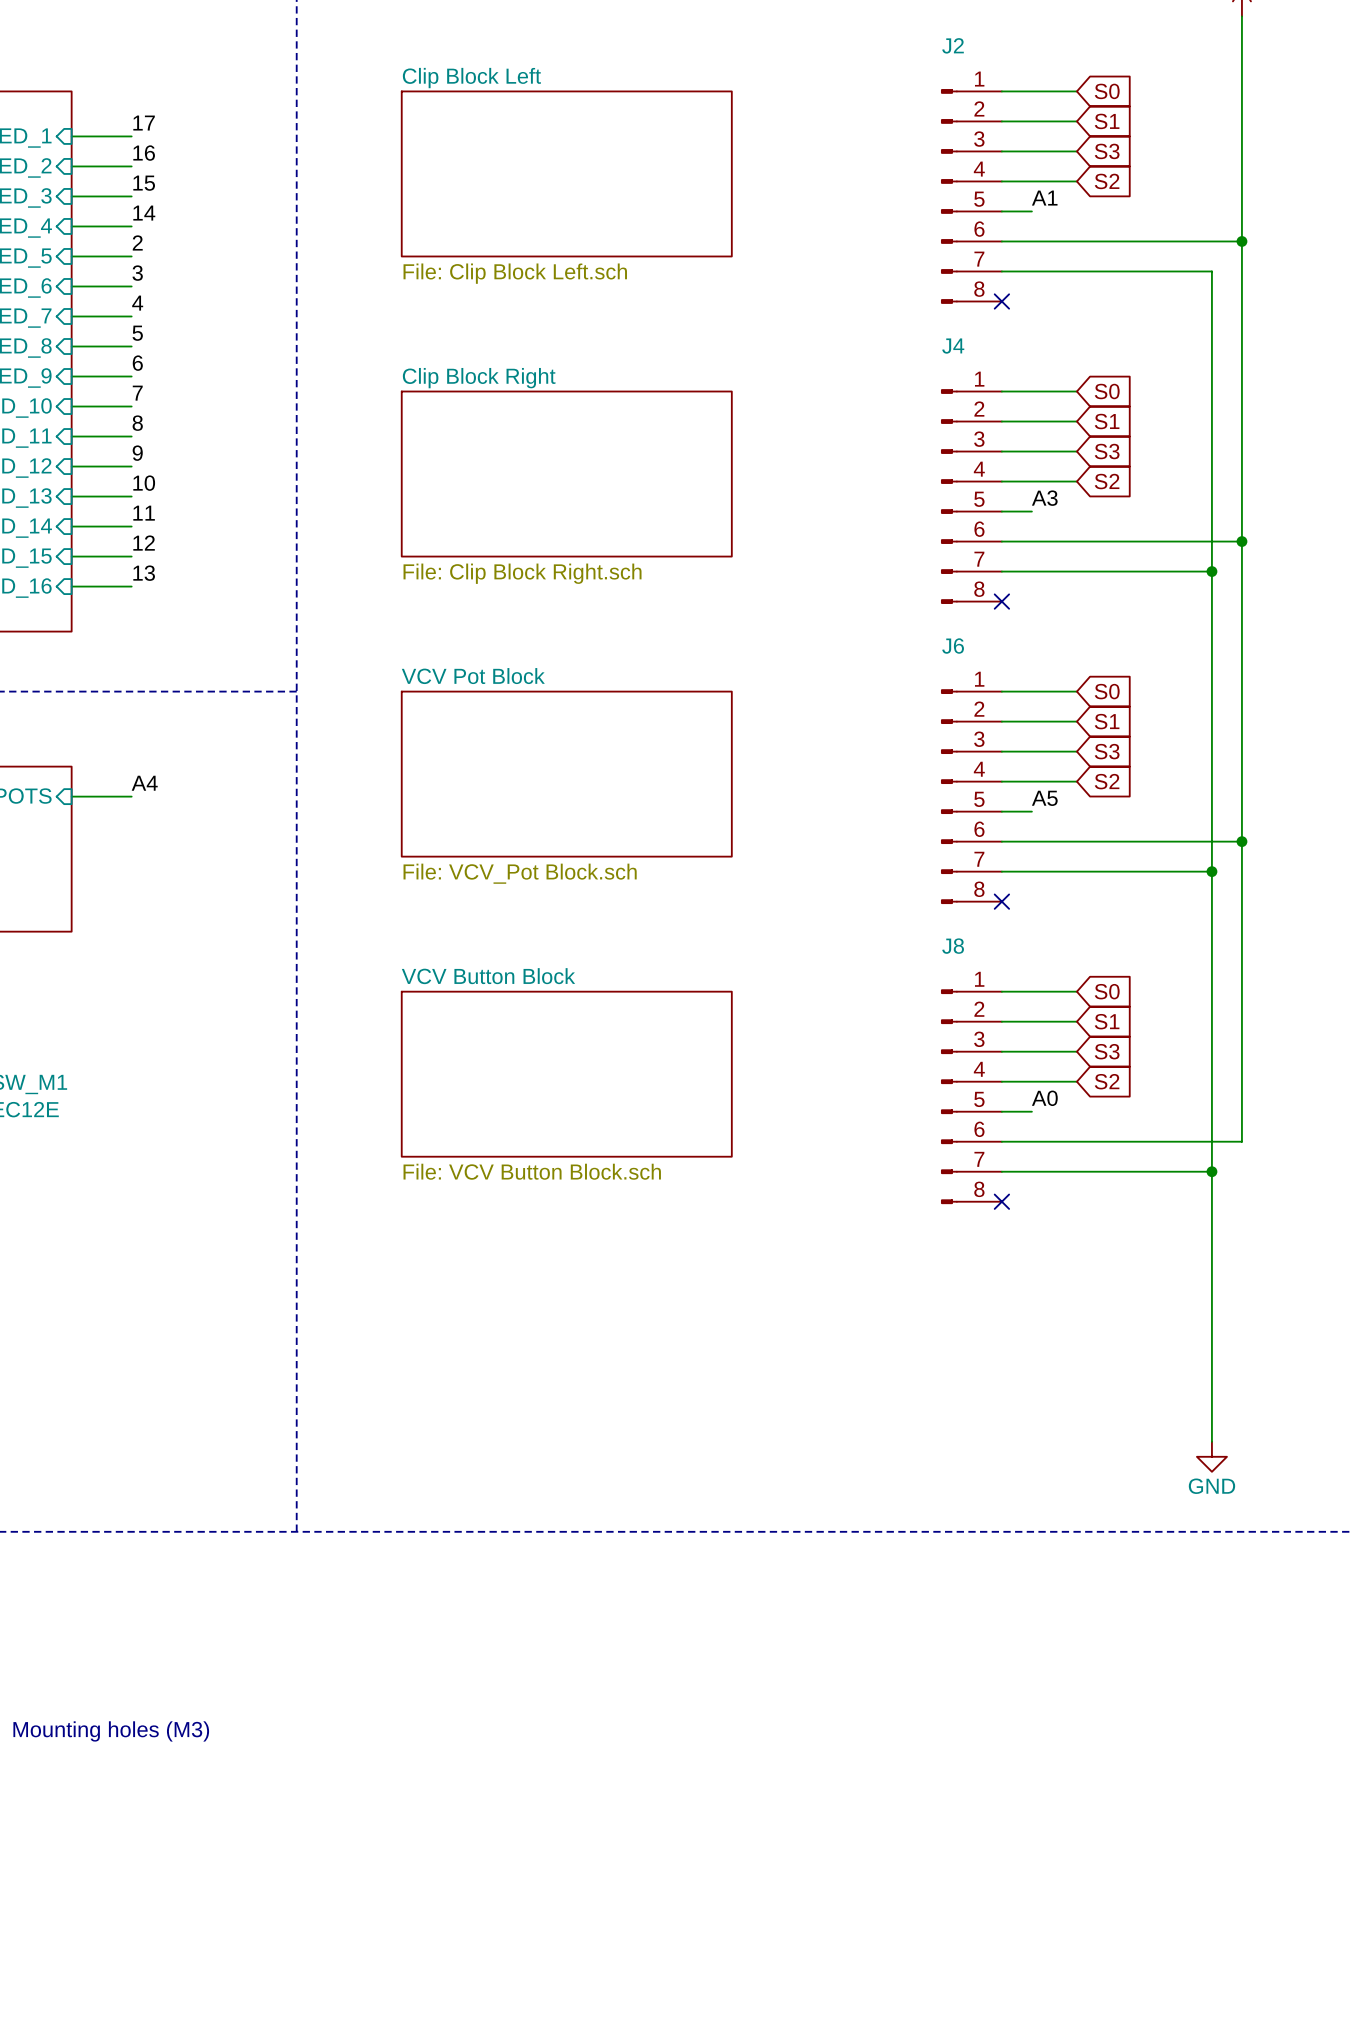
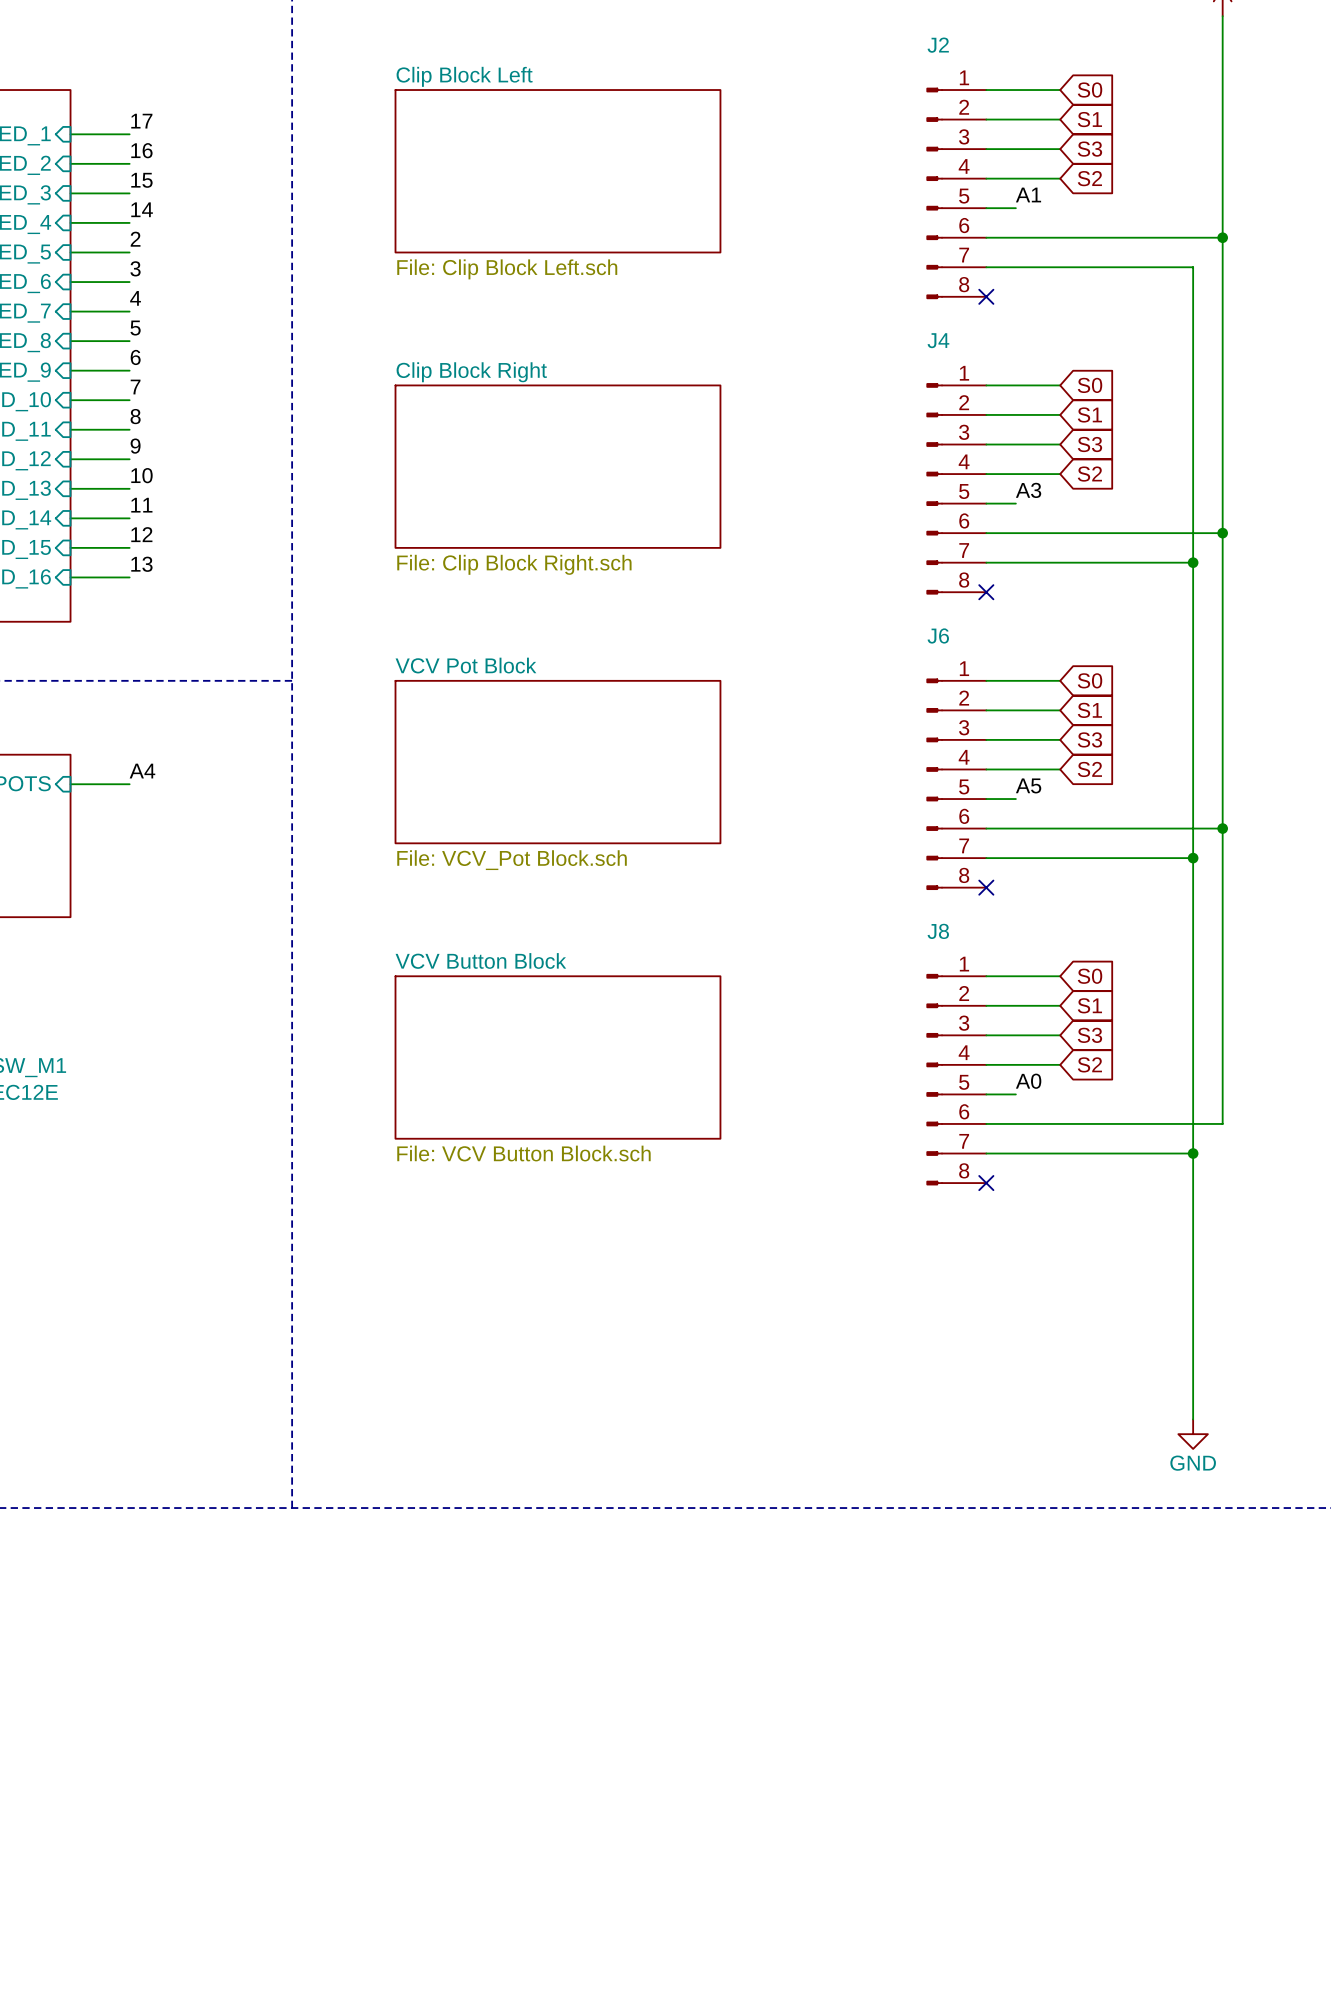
text: Mounting holes (M3) (111, 1731) -> none

